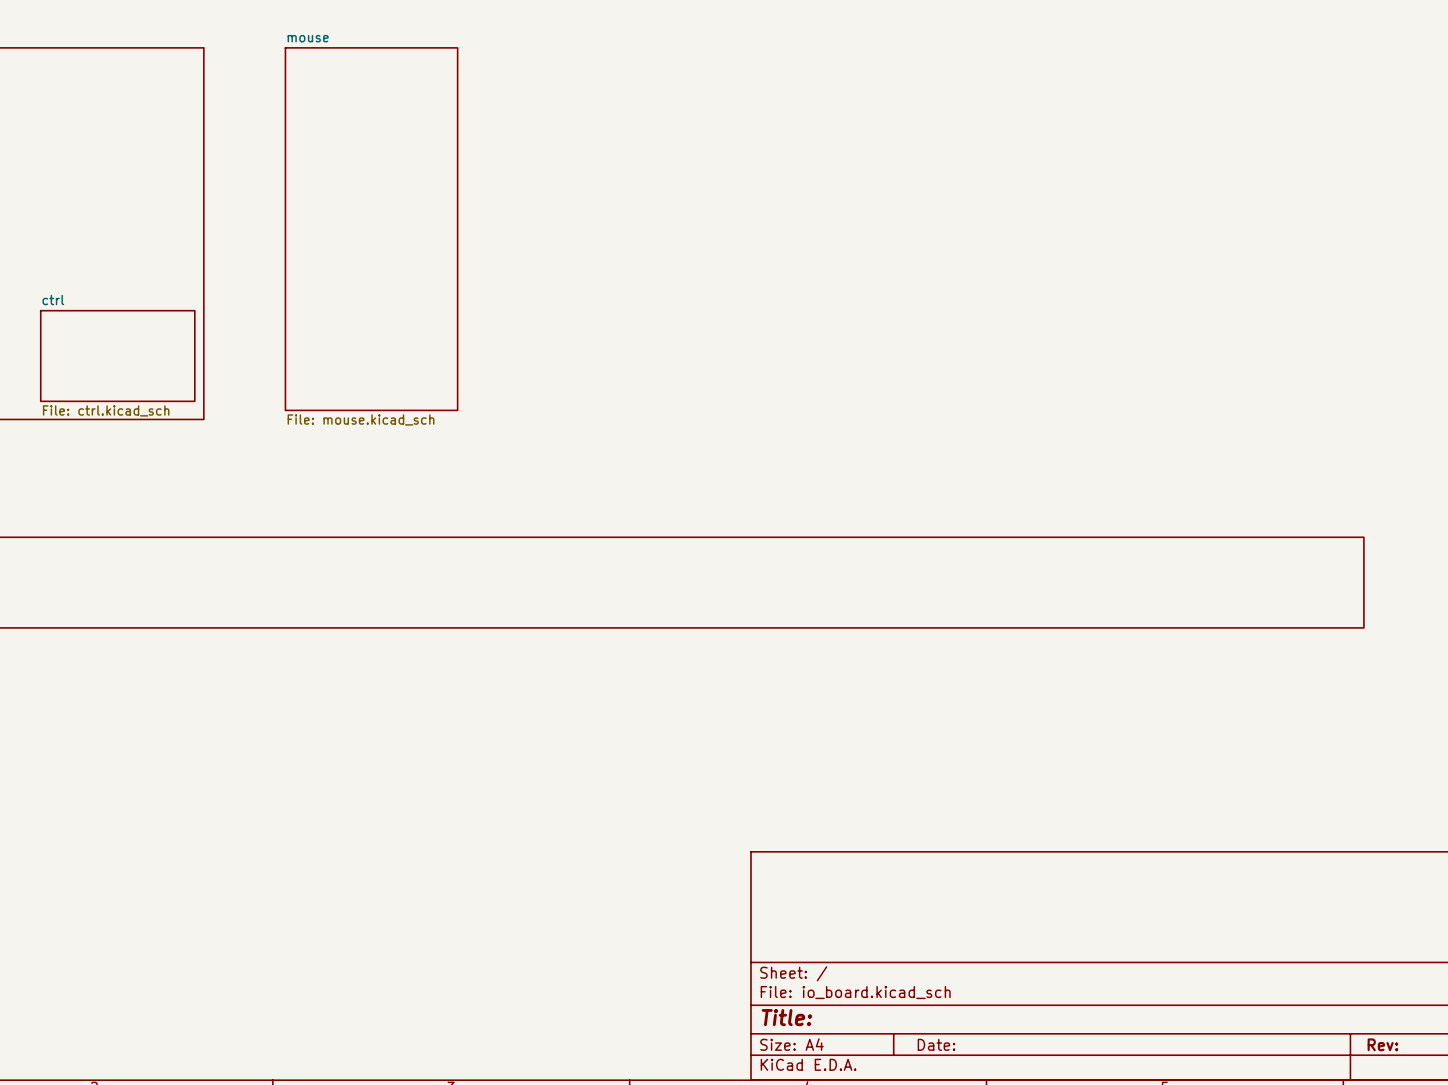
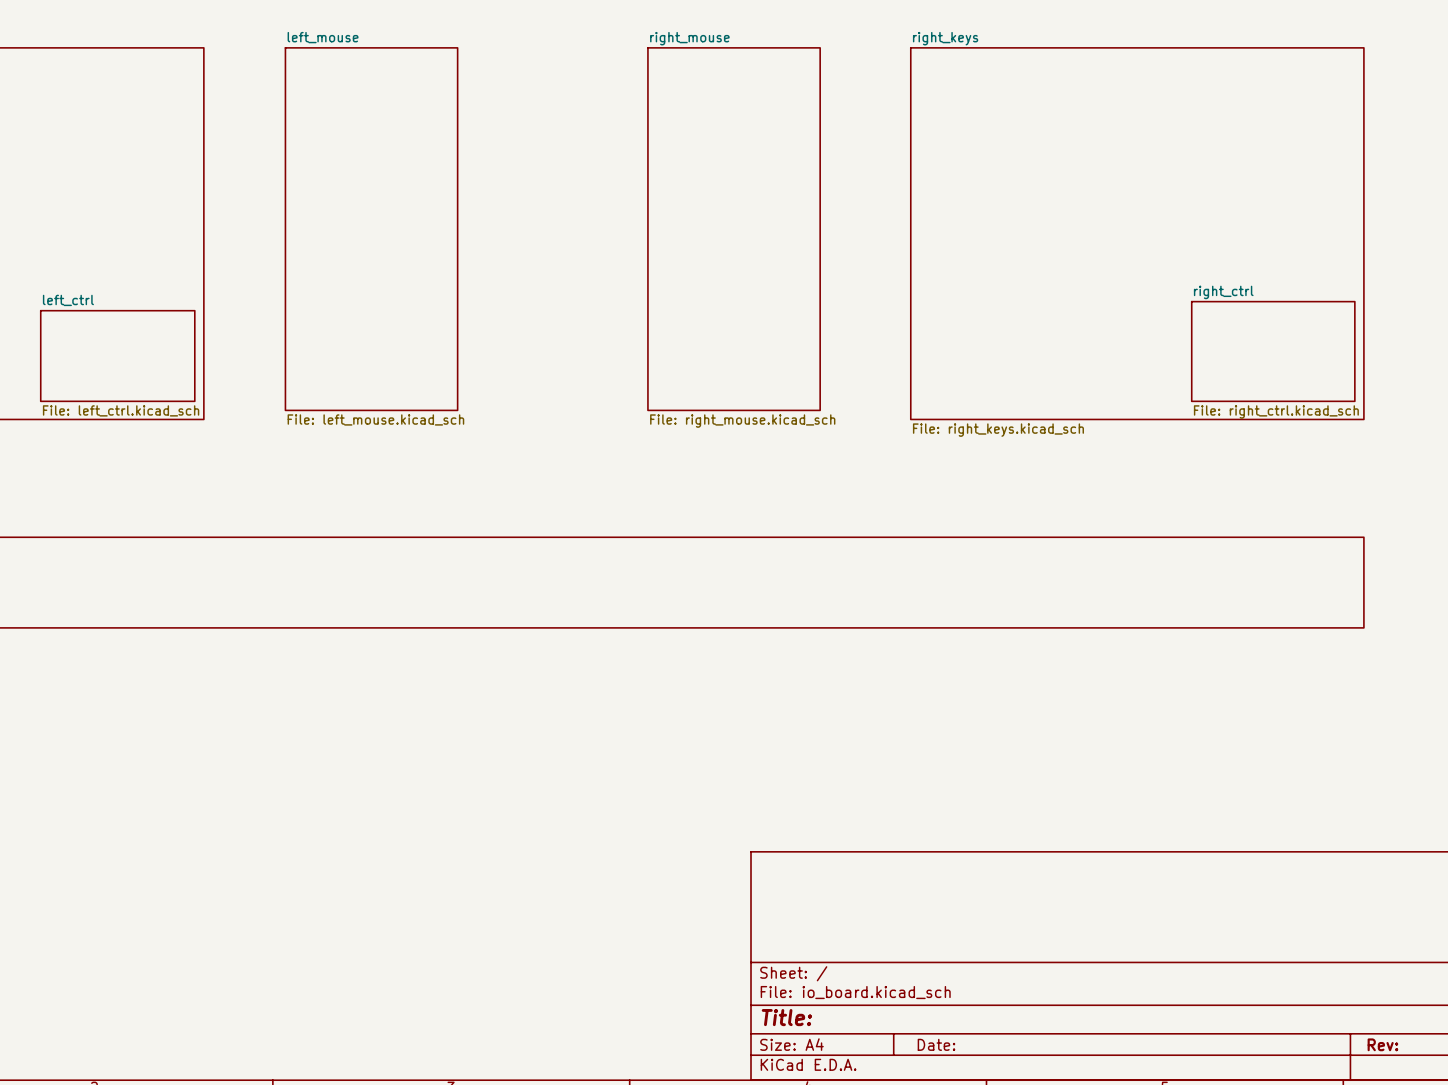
sheet mouse name: mouse (308, 38) -> left_mouse (323, 37)
sheet right_mouse: none -> File: right_mouse.kicad_sch (734, 229)
sheet right_keys: none -> File: right_keys.kicad_sch (1137, 233)
sheet ctrl name: ctrl (53, 299) -> left_ctrl (68, 300)
sheet right_ctrl: none -> File: right_ctrl.kicad_sch (1273, 351)
sheet ctrl value: File: ctrl.kicad_sch (106, 410) -> File: left_ctrl.kicad_sch (121, 410)
sheet mouse value: File: mouse.kicad_sch (361, 419) -> File: left_mouse.kicad_sch (375, 419)

